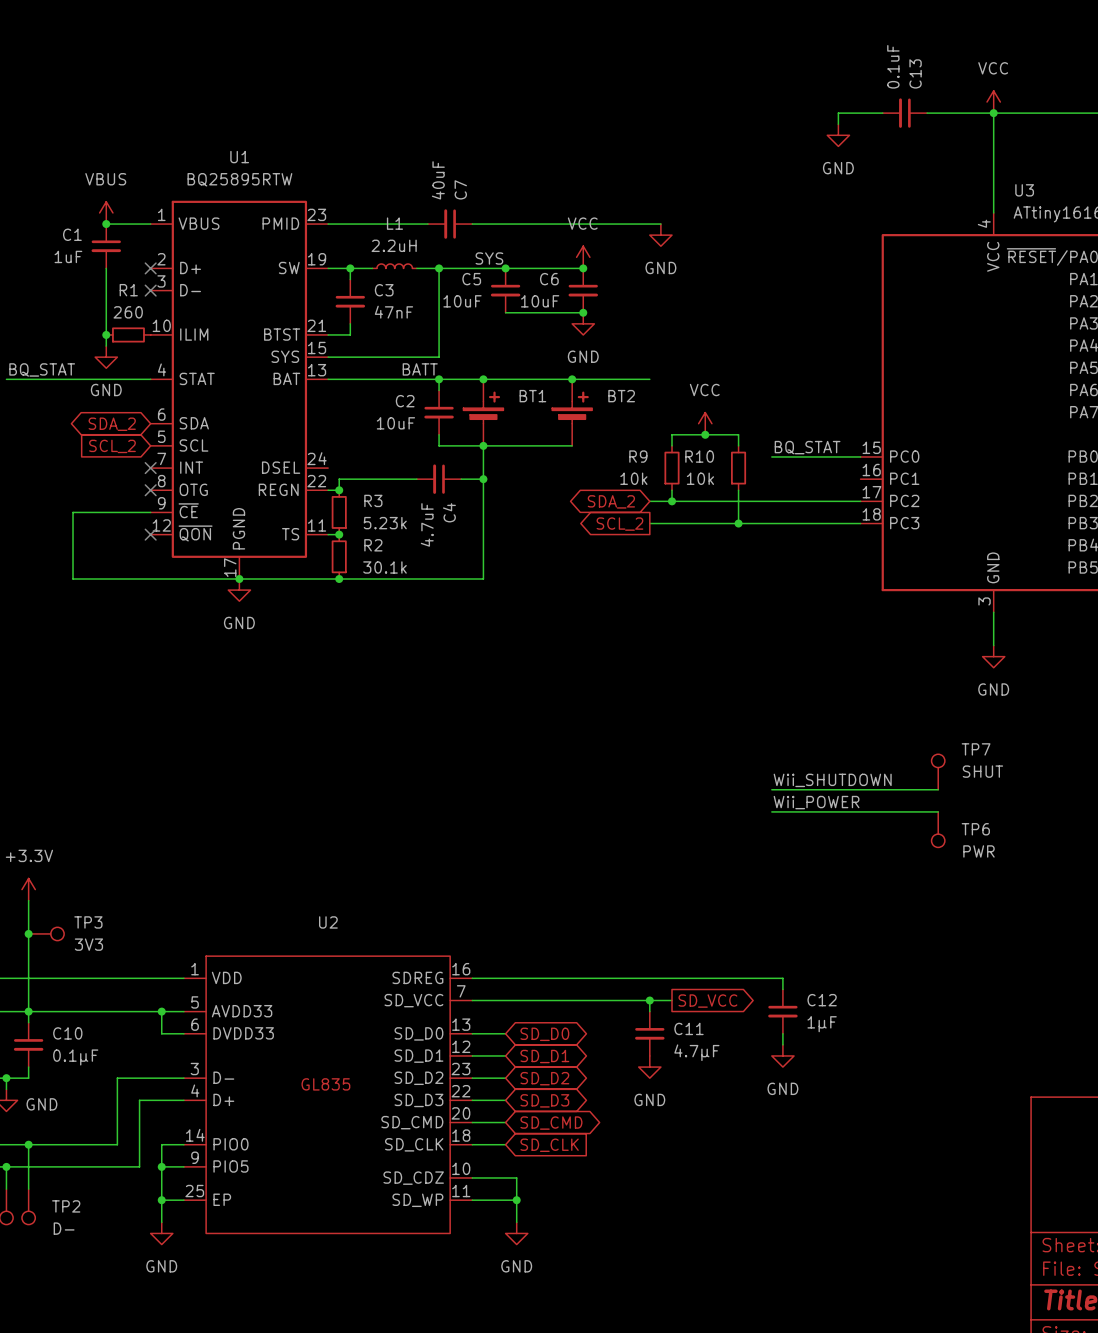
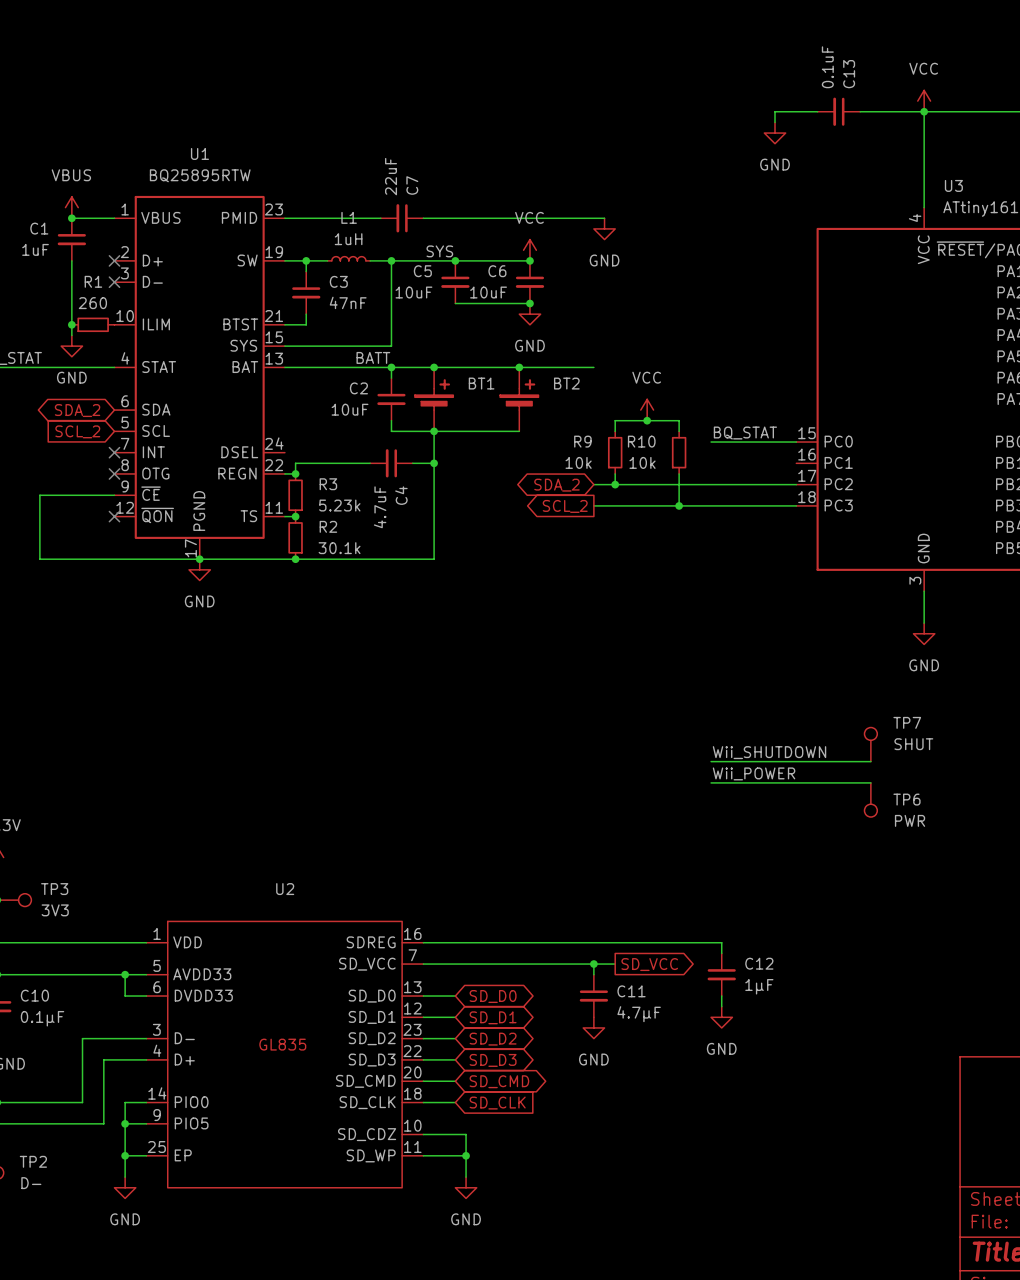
C7 value: 40uF (438, 180) -> 22uF (391, 176)
L1 value: 2.2uH (394, 245) -> 1uH (348, 239)

